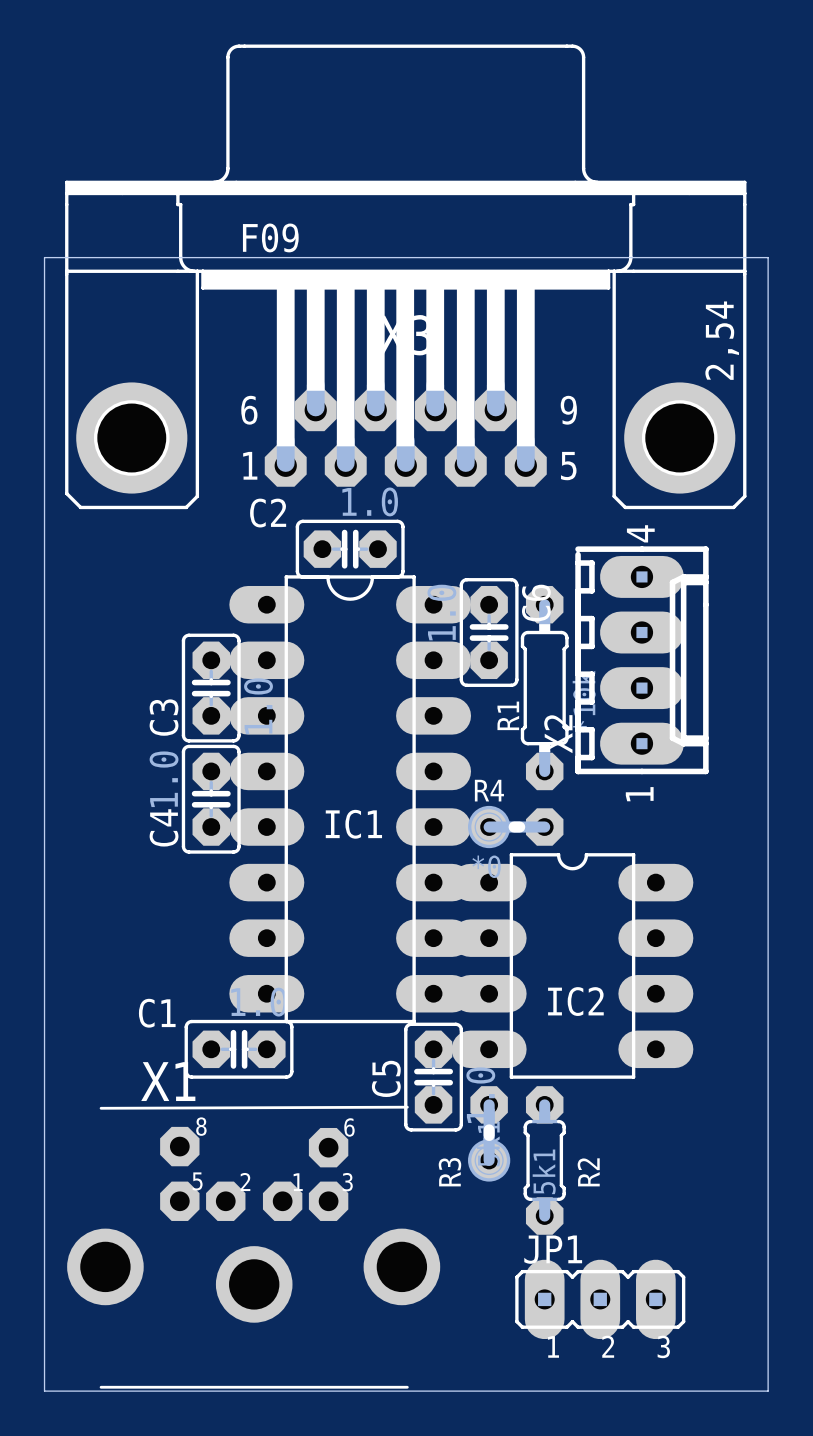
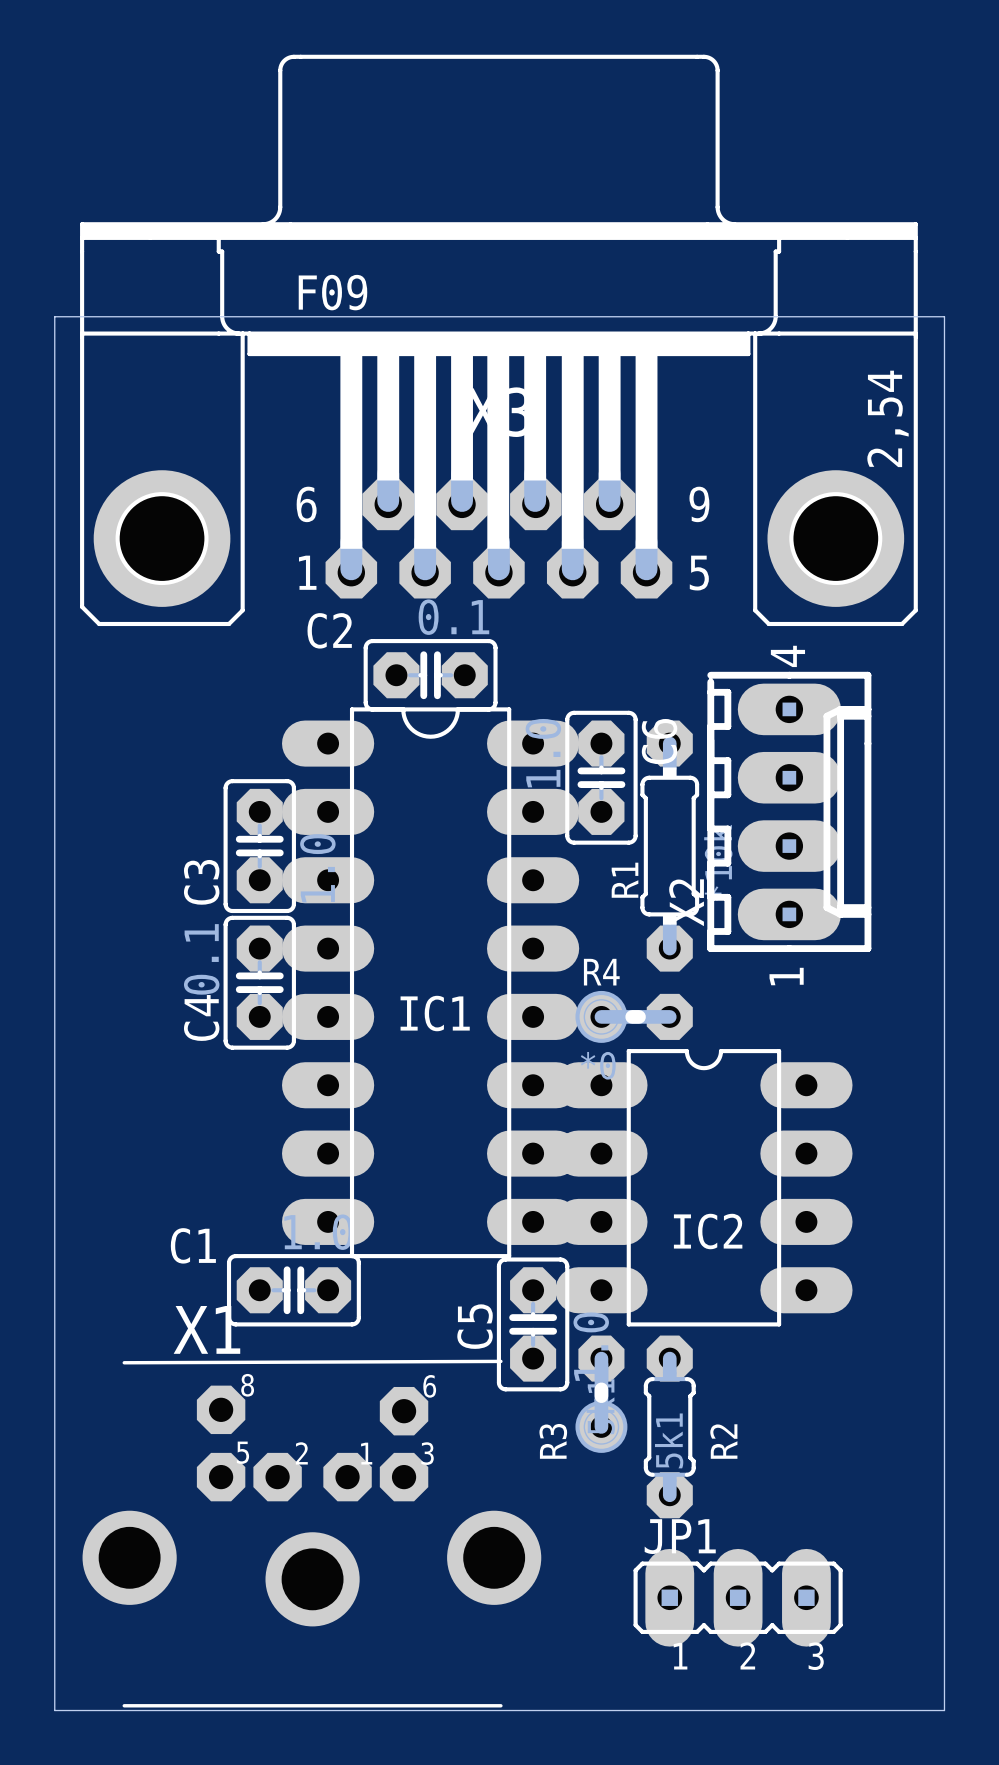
C2 value: 1.0 (370, 501) -> 0.1 (453, 617)
C4 value: 1.0 (164, 779) -> 0.1 (201, 959)

